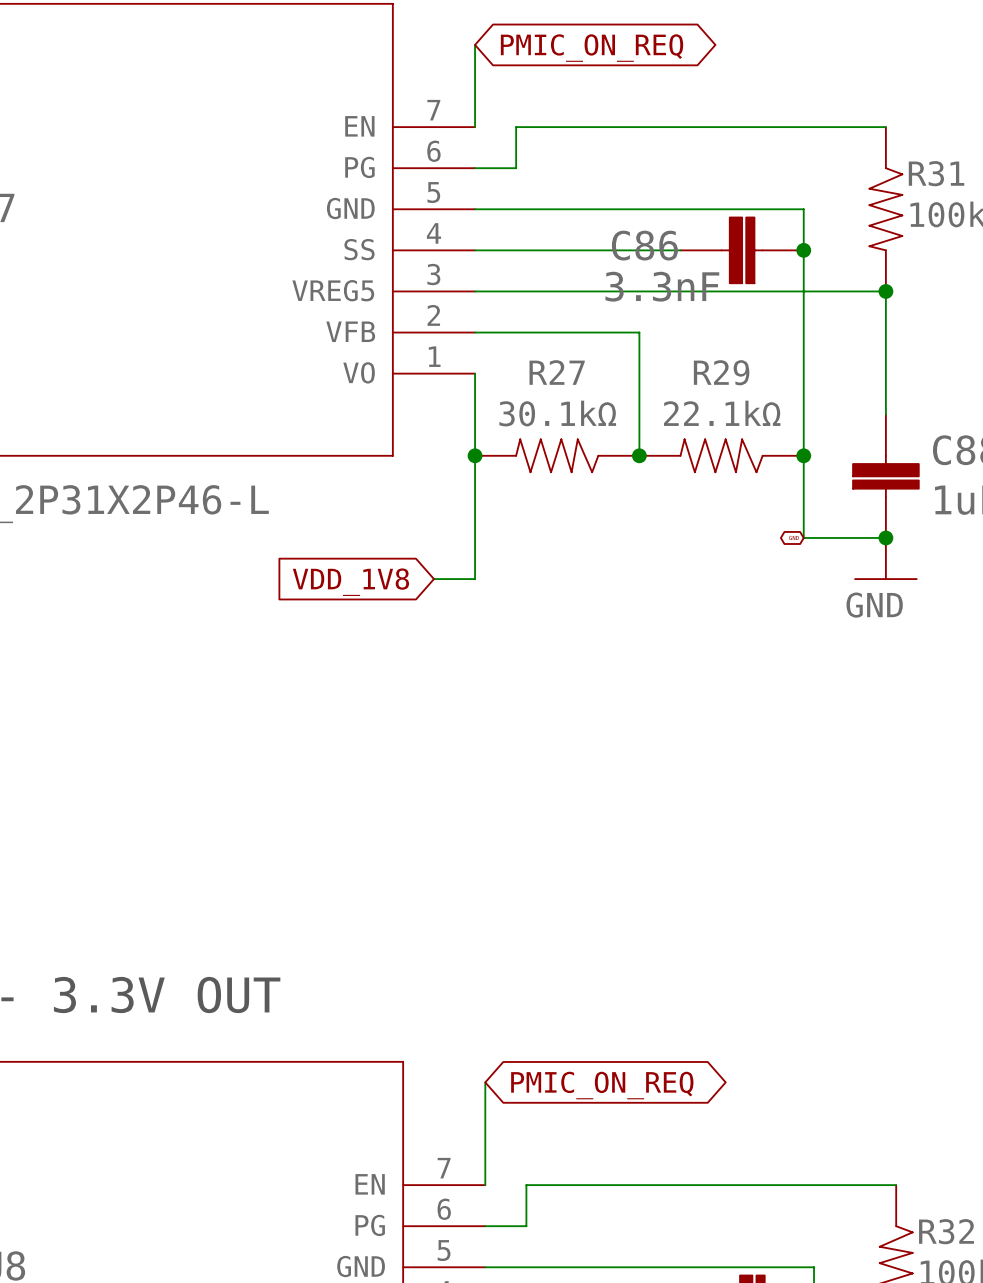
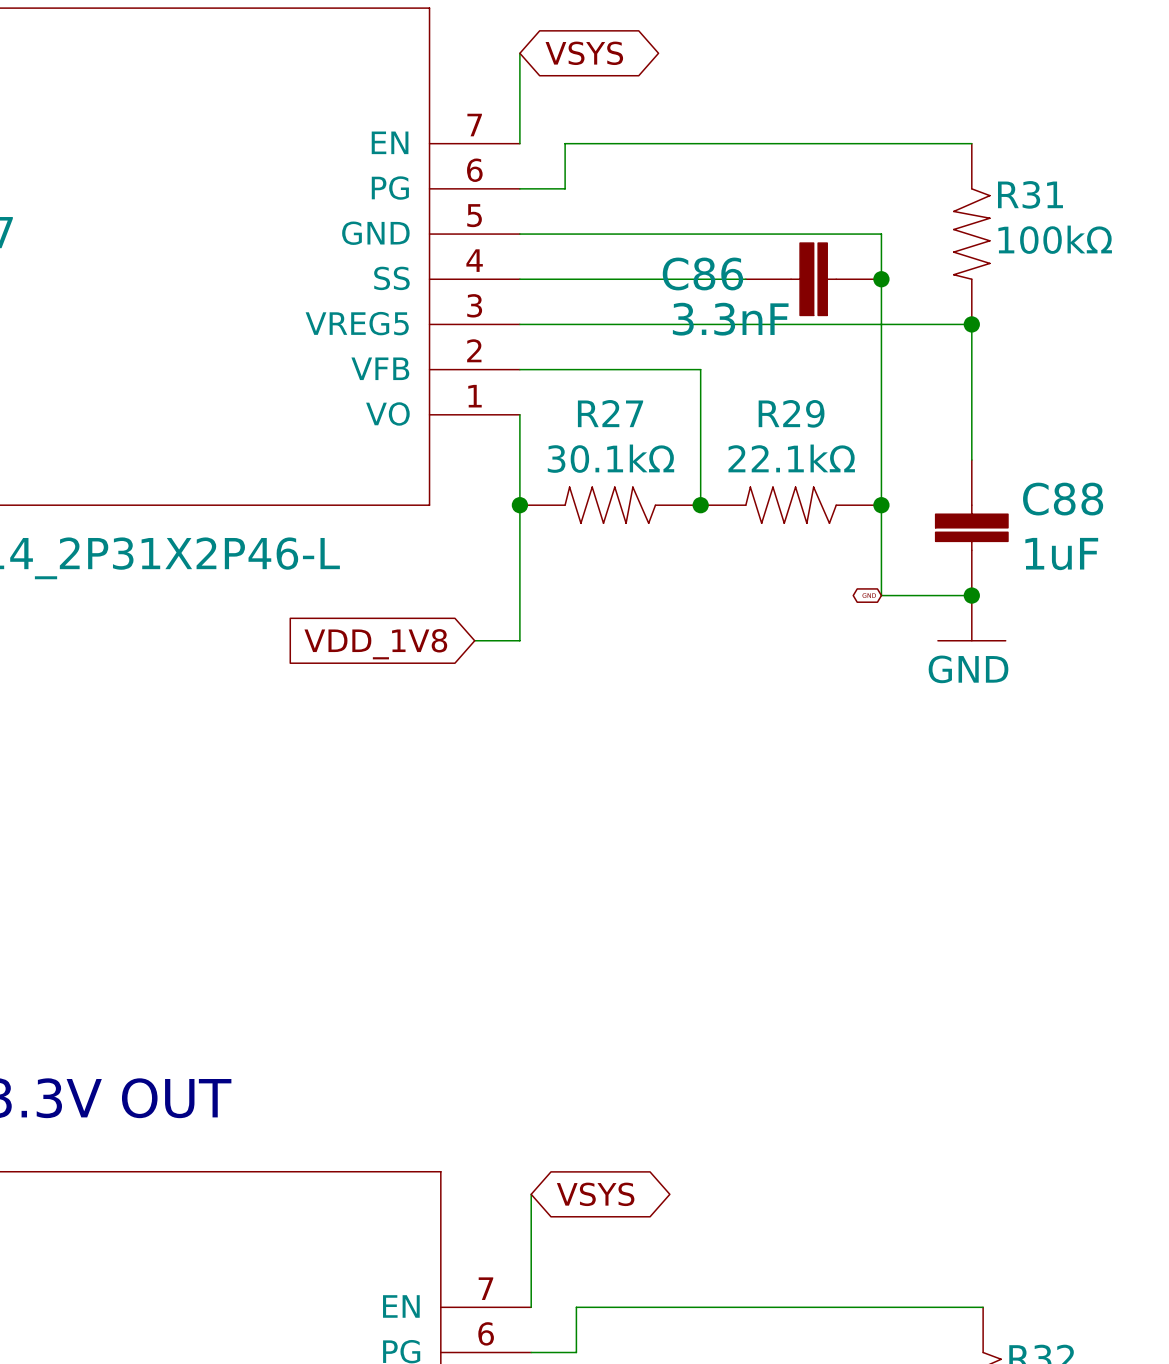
global label: PMIC_ON_REQ (592, 48) -> VSYS (584, 53)
global label: PMIC_ON_REQ (602, 1085) -> VSYS (595, 1194)

